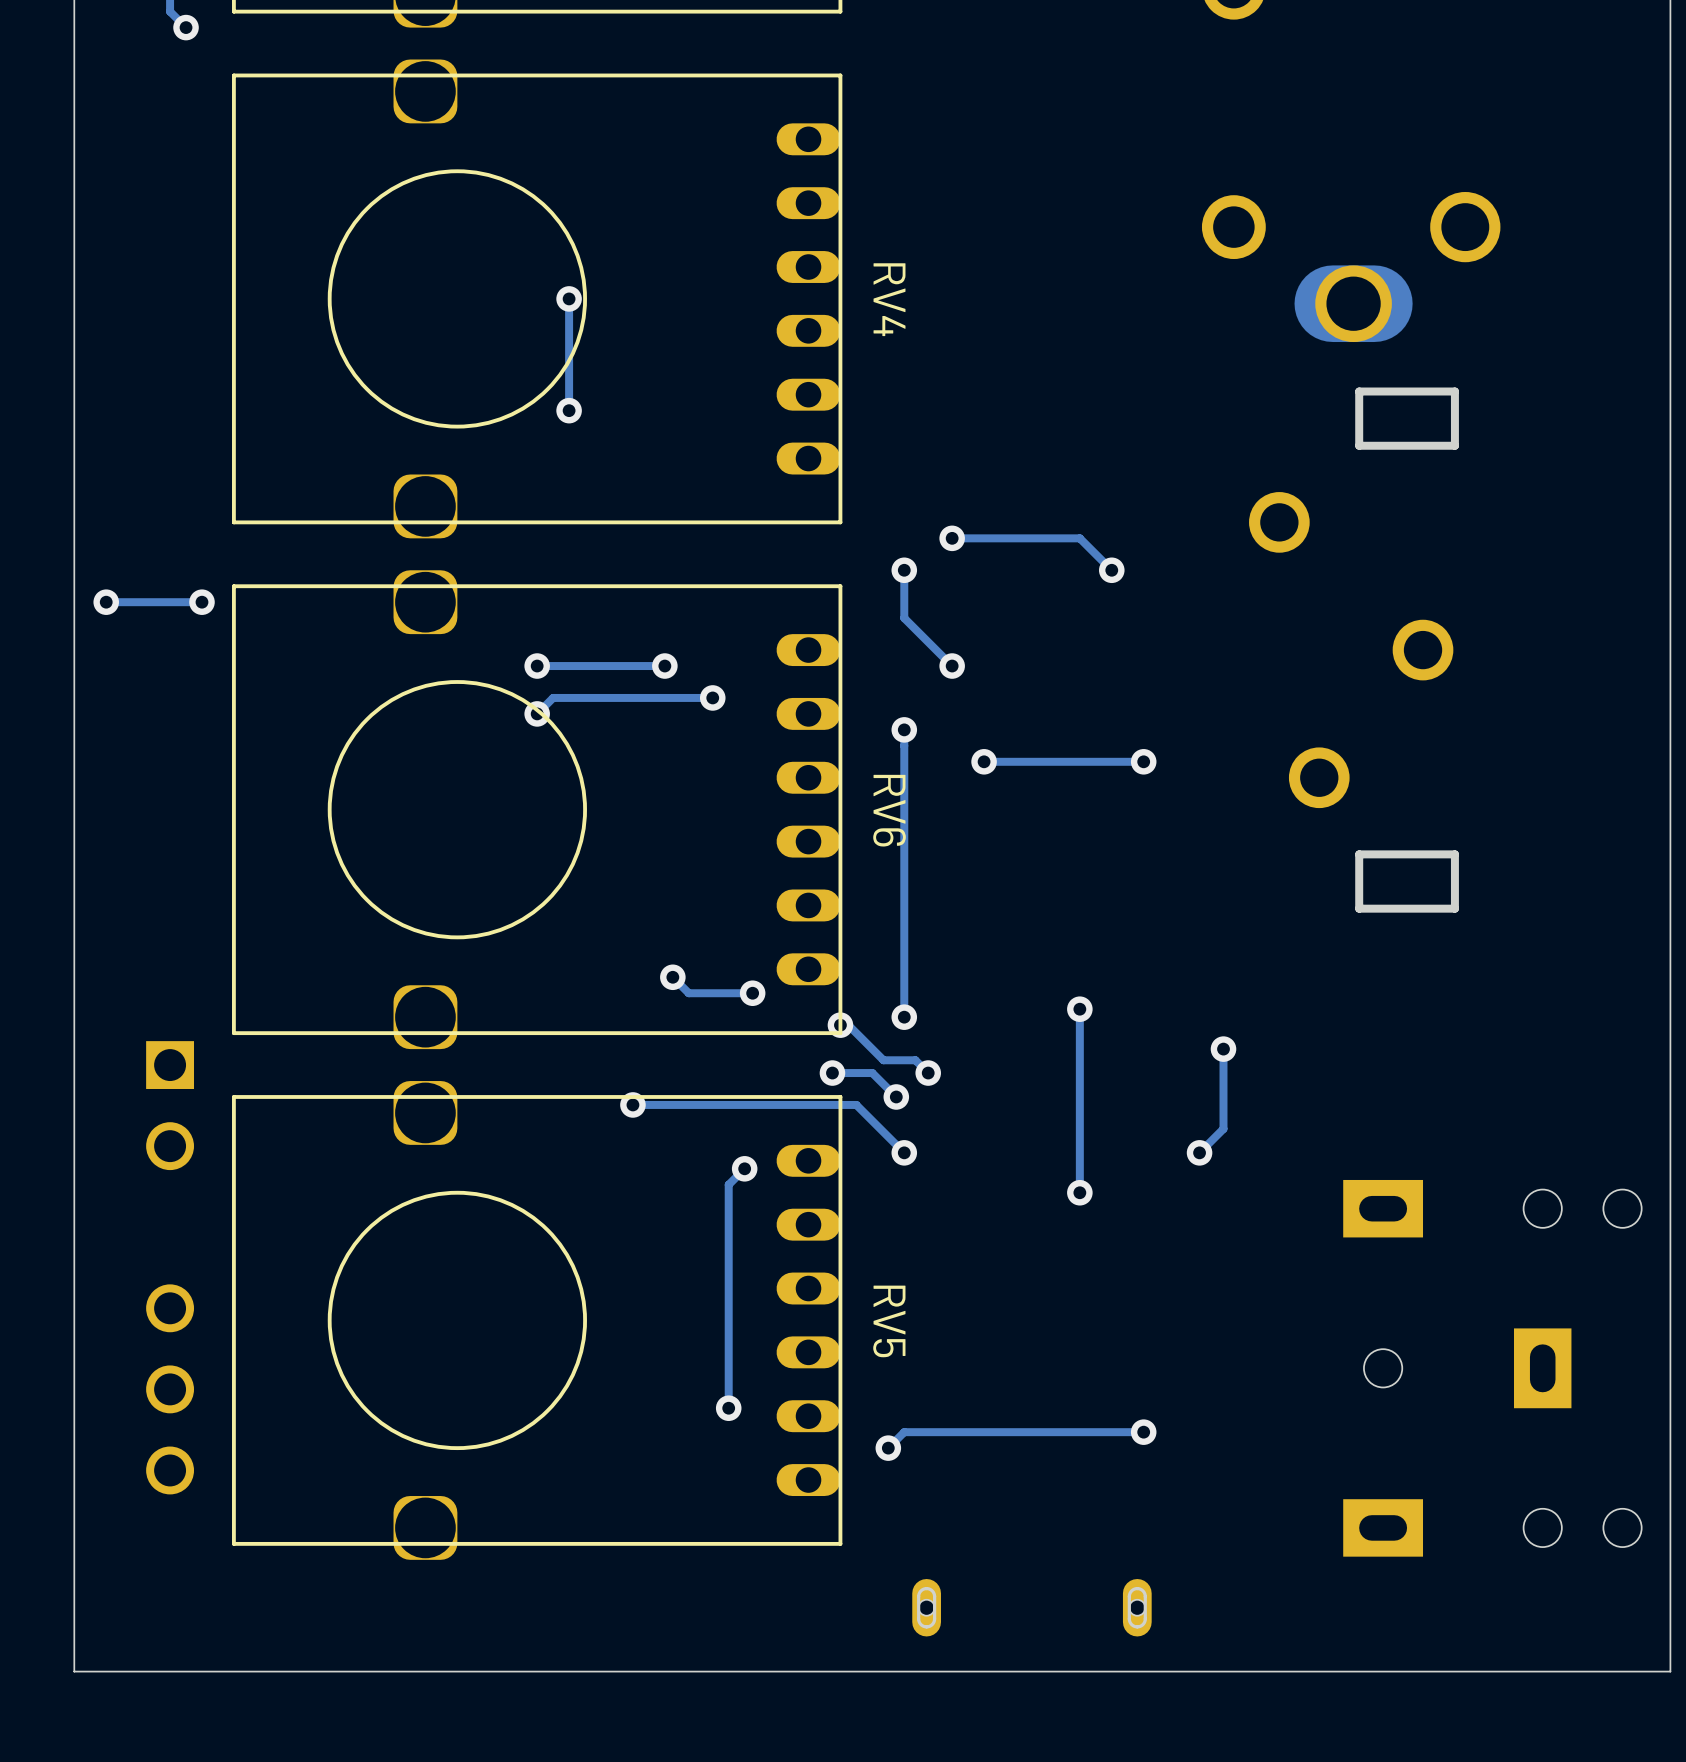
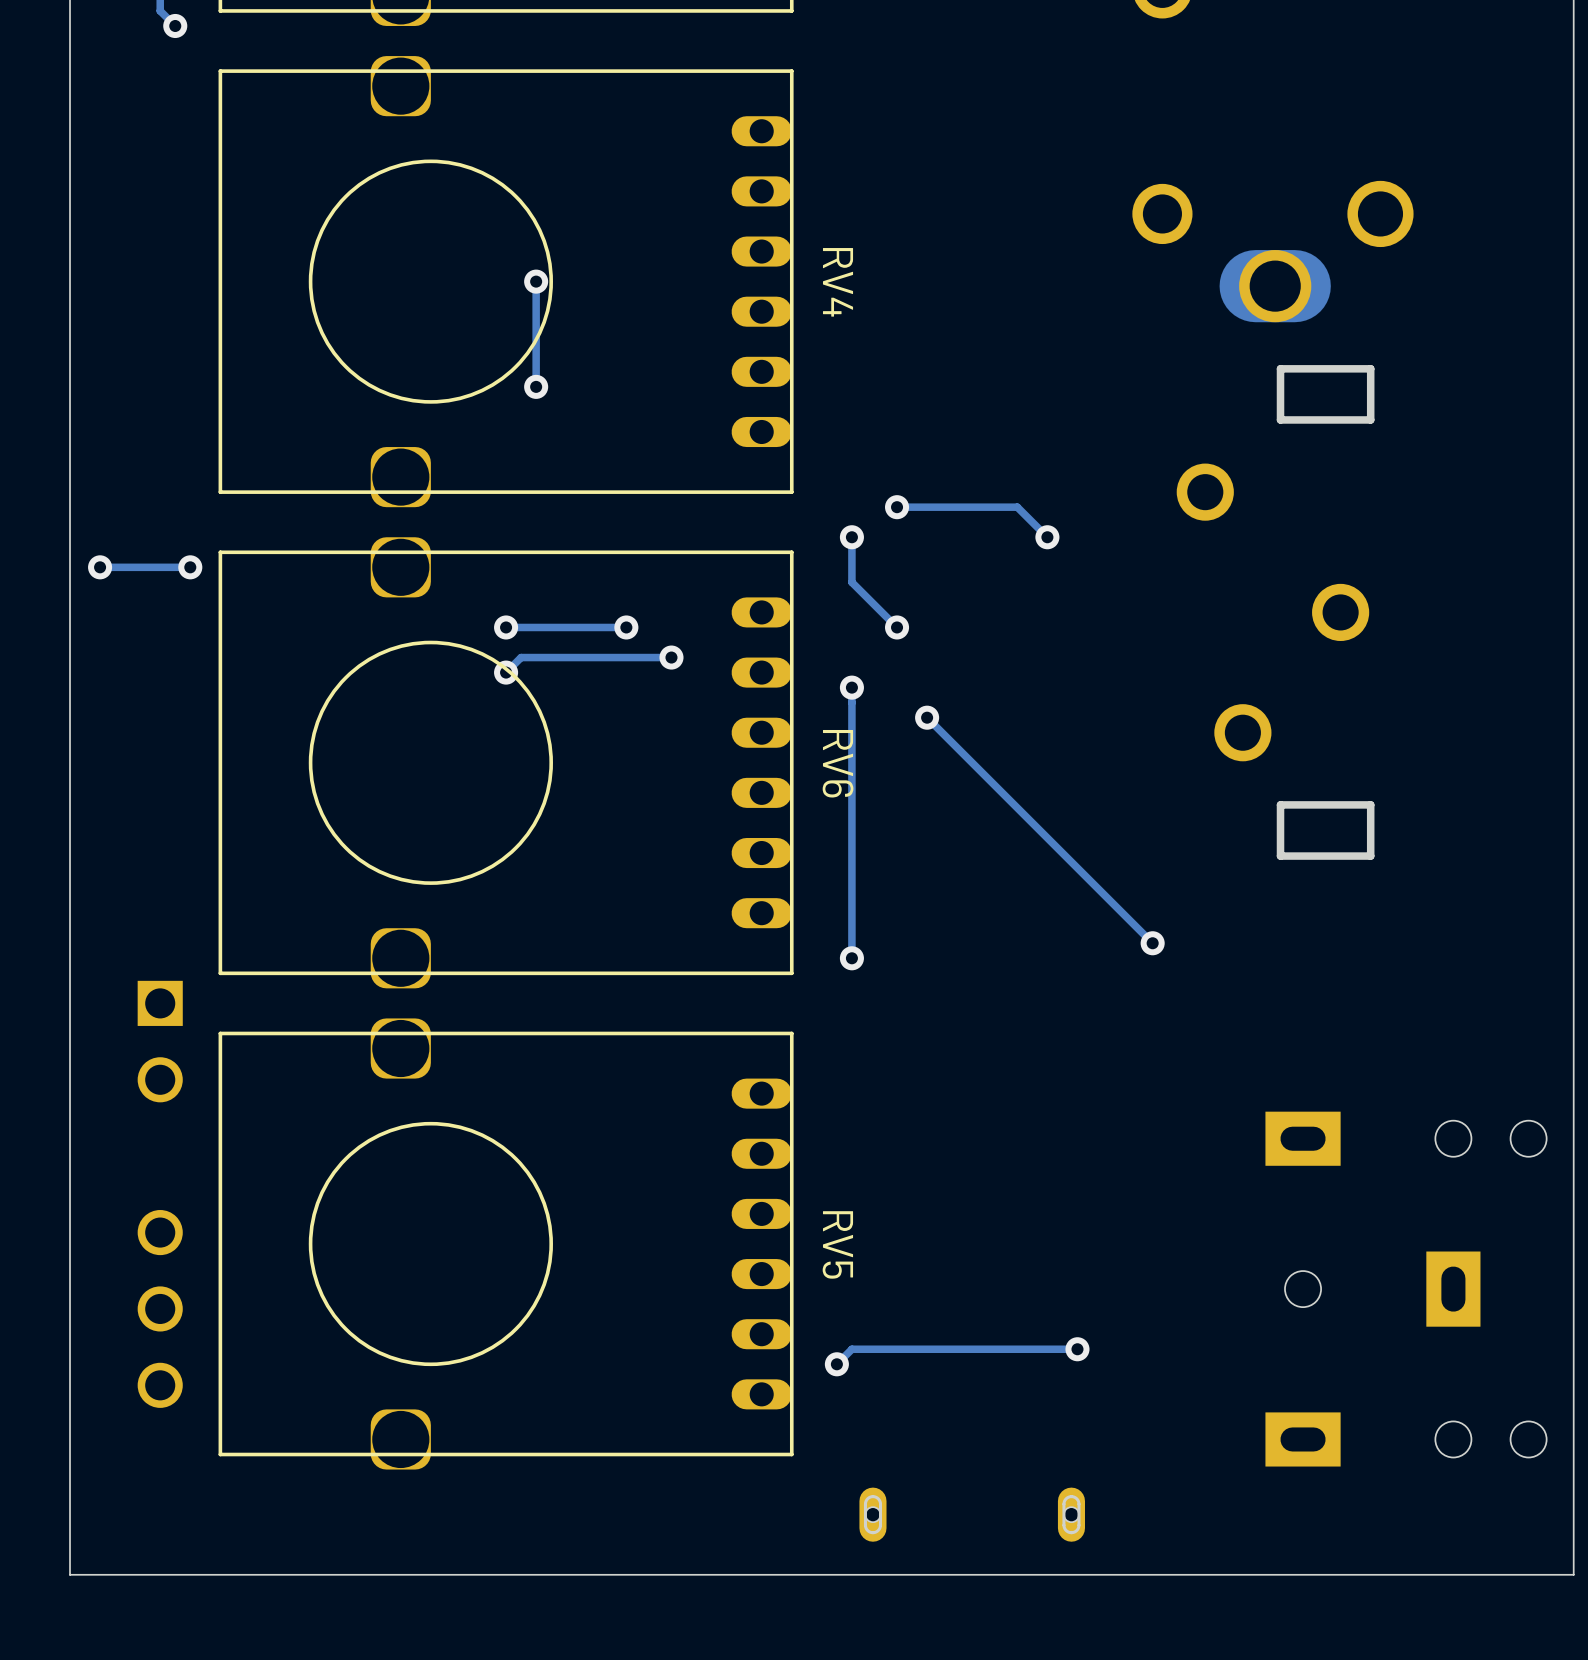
track: (1143, 761) (984, 761) -> (1152, 943) (927, 717)
via: (1143, 761) -> none
track: (672, 977) (688, 993) (752, 993) -> none
via: (672, 977) -> none
via: (752, 993) -> none
track: (1079, 1009) (1079, 1192) -> none
via: (1079, 1009) -> none
track: (840, 1025) (848, 1025) (883, 1060) (915, 1060) (928, 1073) -> none
via: (840, 1025) -> none
track: (1223, 1049) (1223, 1128) (1199, 1152) -> none
via position: (1223, 1049) -> (1152, 943)
track: (832, 1073) (872, 1073) (896, 1096) -> none
via: (832, 1073) -> none
via: (928, 1073) -> none
via: (896, 1096) -> none
track: (632, 1104) (856, 1104) (904, 1152) -> none
via: (632, 1104) -> none
via: (904, 1152) -> none
via: (1199, 1152) -> none
track: (744, 1168) (728, 1184) (728, 1408) -> none
via: (744, 1168) -> none
via: (1079, 1192) -> none
via: (728, 1408) -> none

